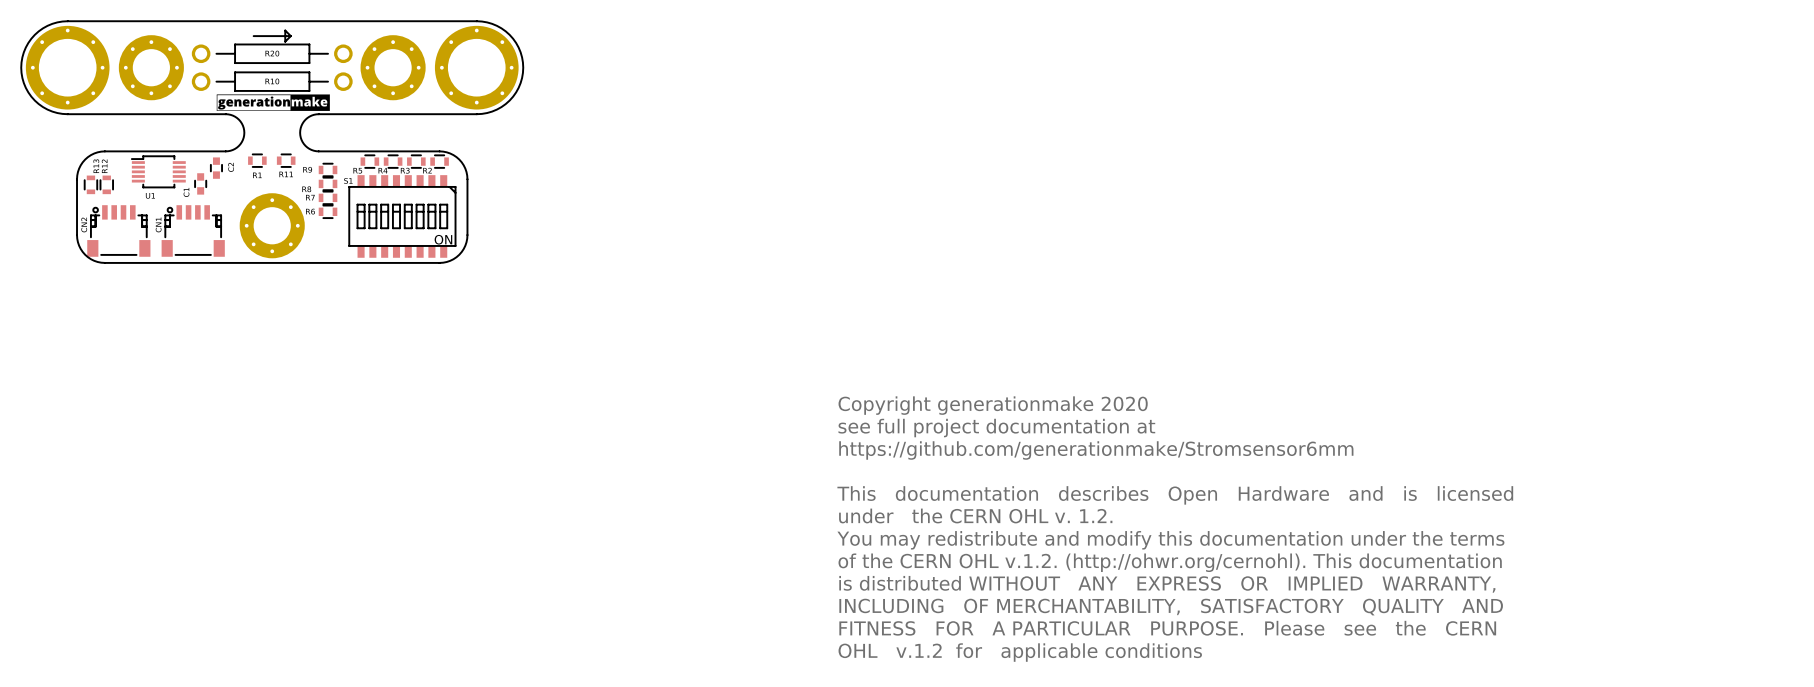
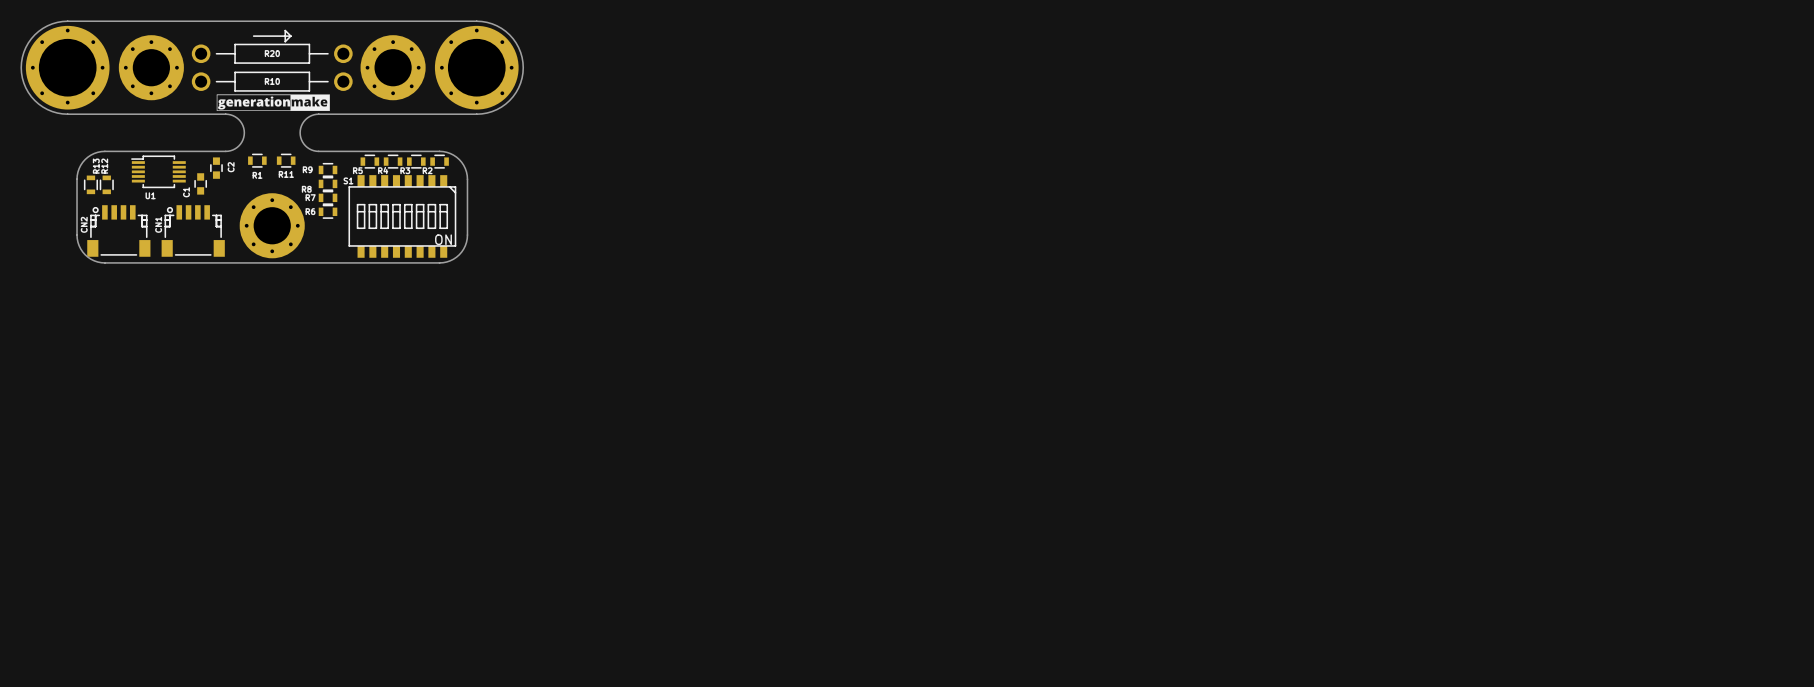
text: Copyright generationmake 2020 (993, 405) -> none
text: see full project documentation at (996, 428) -> none
text: https://github.com/generationmake/Stromsensor6mm (1096, 450) -> none
text: This documentation describes Open Hardware and is licensed (1175, 495) -> none
text: under the CERN OHL v. 1.2. (975, 515) -> none
text: You may redistribute and modify this documentation under the terms (1170, 540) -> none
text: of the CERN OHL v.1.2. (http://ohwr.org/cernohl). This documentation (1170, 562) -> none
text: is distributed WITHOUT ANY EXPRESS OR IMPLIED WARRANTY, (1167, 584) -> none
text: INCLUDING OF MERCHANTABILITY, SATISFACTORY QUALITY AND (1171, 607) -> none
text: FITNESS FOR A PARTICULAR PURPOSE. Please see the CERN (1167, 628) -> none
text: OHL v.1.2 for applicable conditions (1020, 652) -> none

